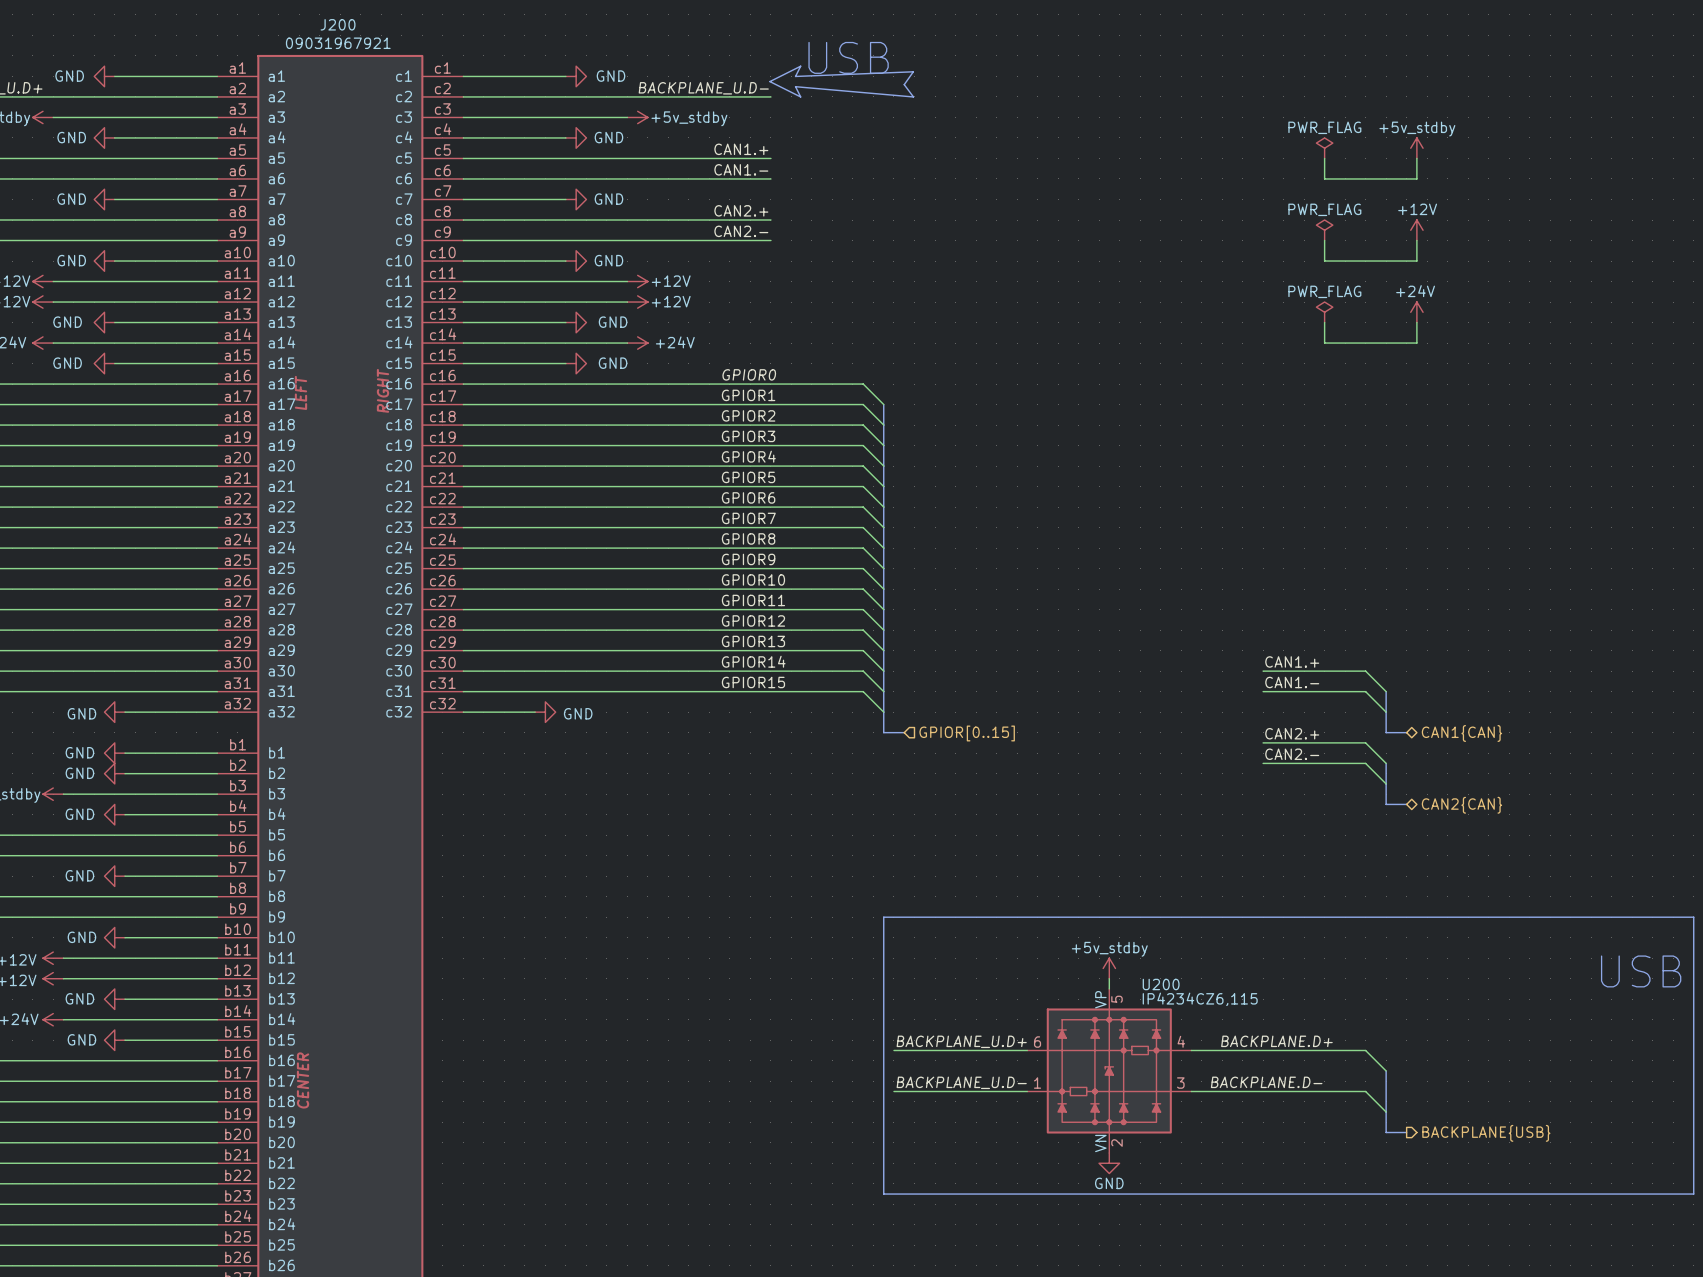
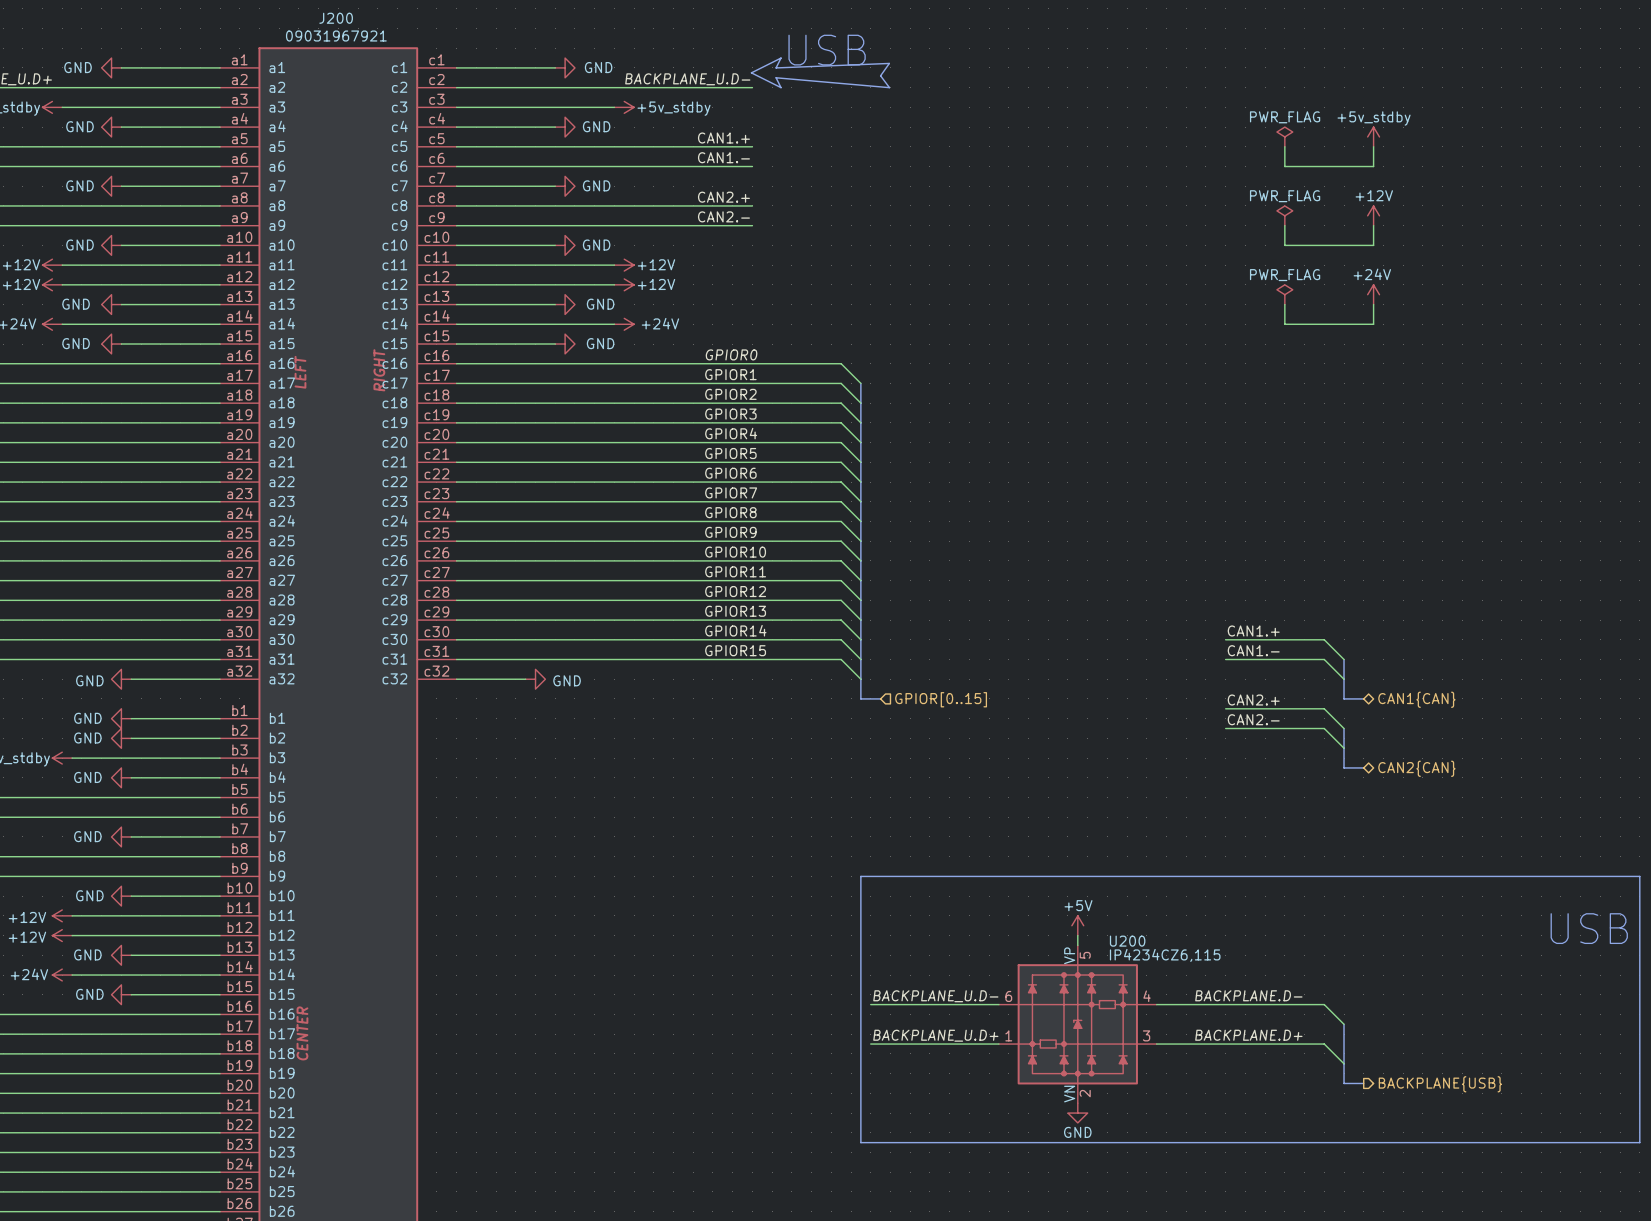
power symbol: +5v_stdby (1109, 968) -> +5V (1077, 925)
label: BACKPLANE_U.D+ (961, 1041) -> BACKPLANE_U.D- (935, 996)
label position: BACKPLANE.D+ (1276, 1041) -> BACKPLANE.D+ (1248, 1035)
label: BACKPLANE_U.D- (961, 1082) -> BACKPLANE_U.D+ (935, 1035)
label position: BACKPLANE.D- (1266, 1082) -> BACKPLANE.D- (1248, 995)

